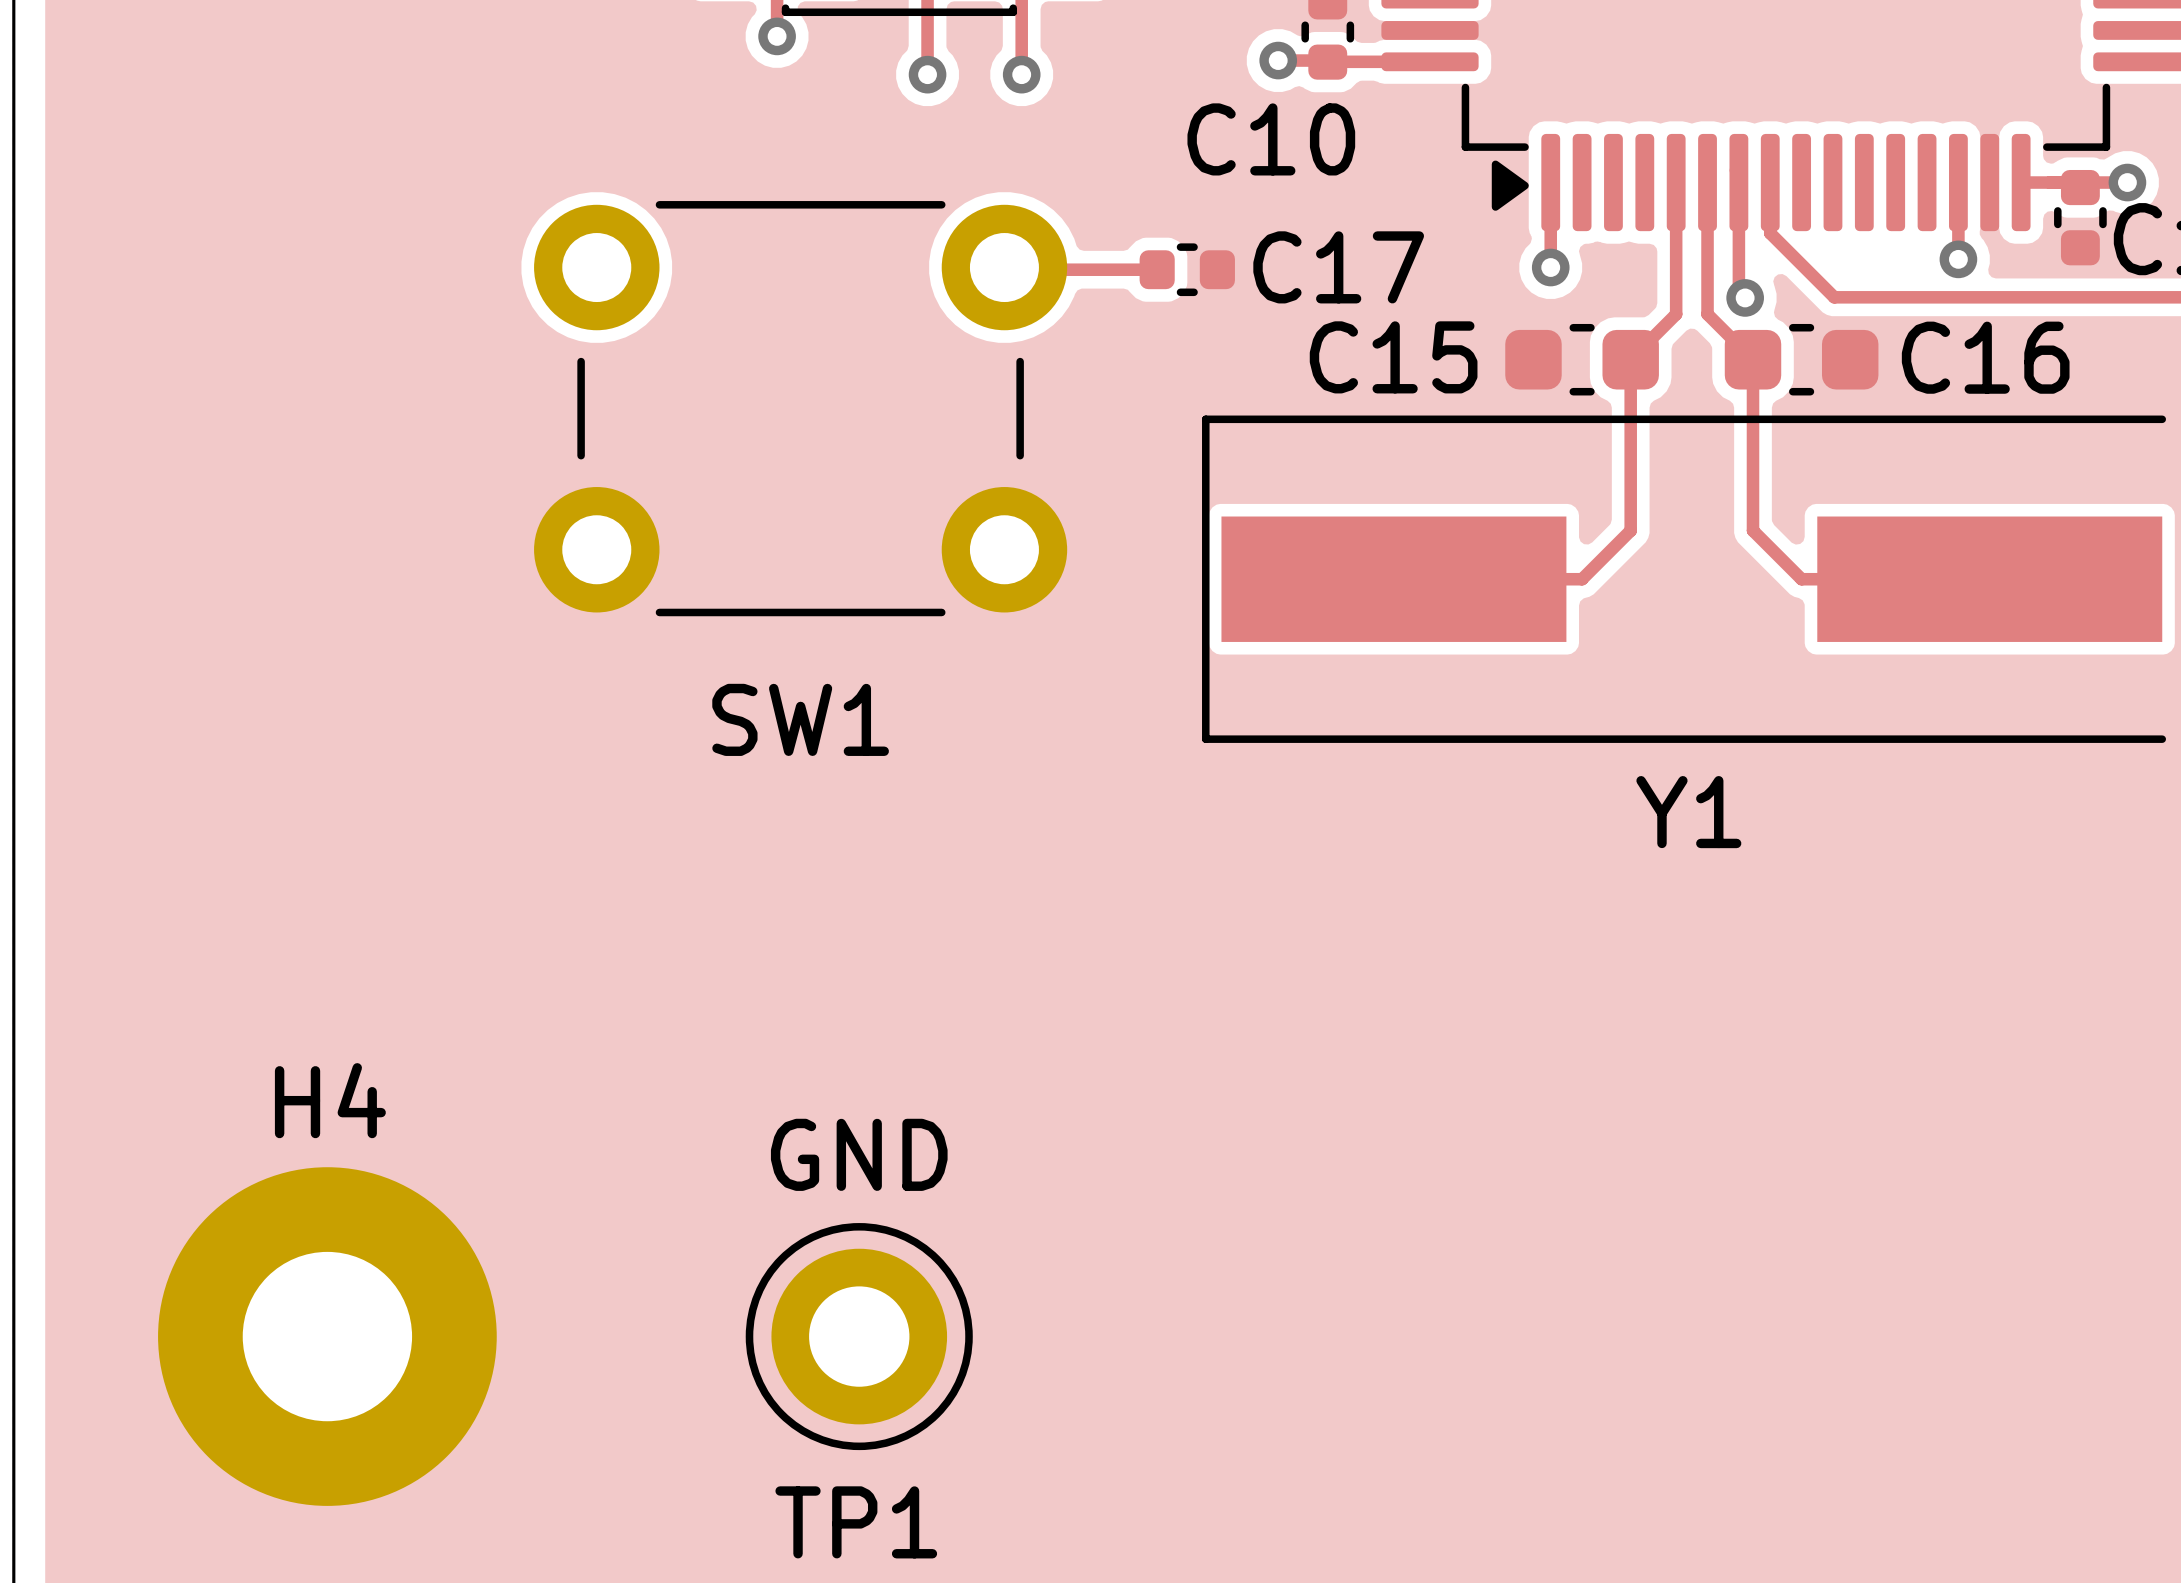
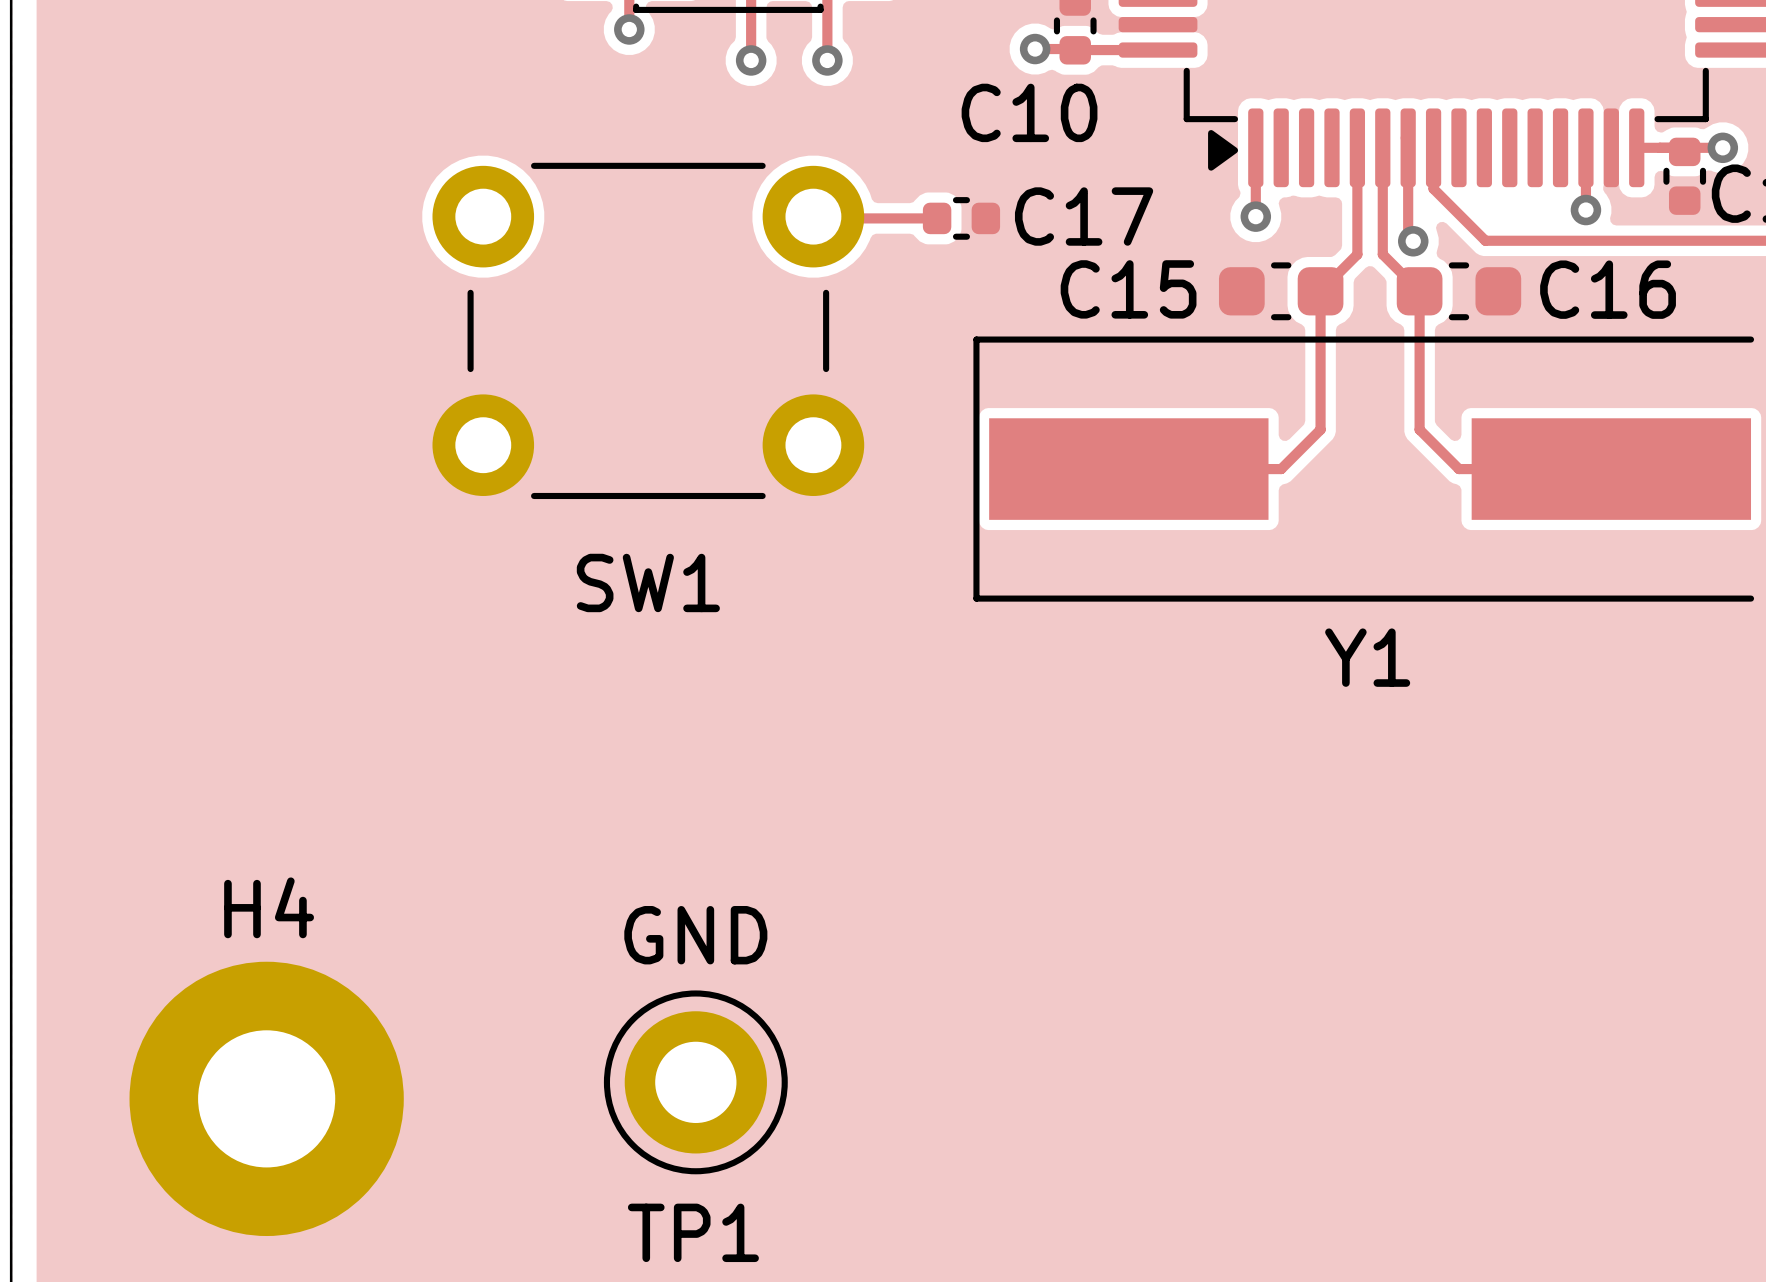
H4 position: (327, 1336) -> (266, 1098)

